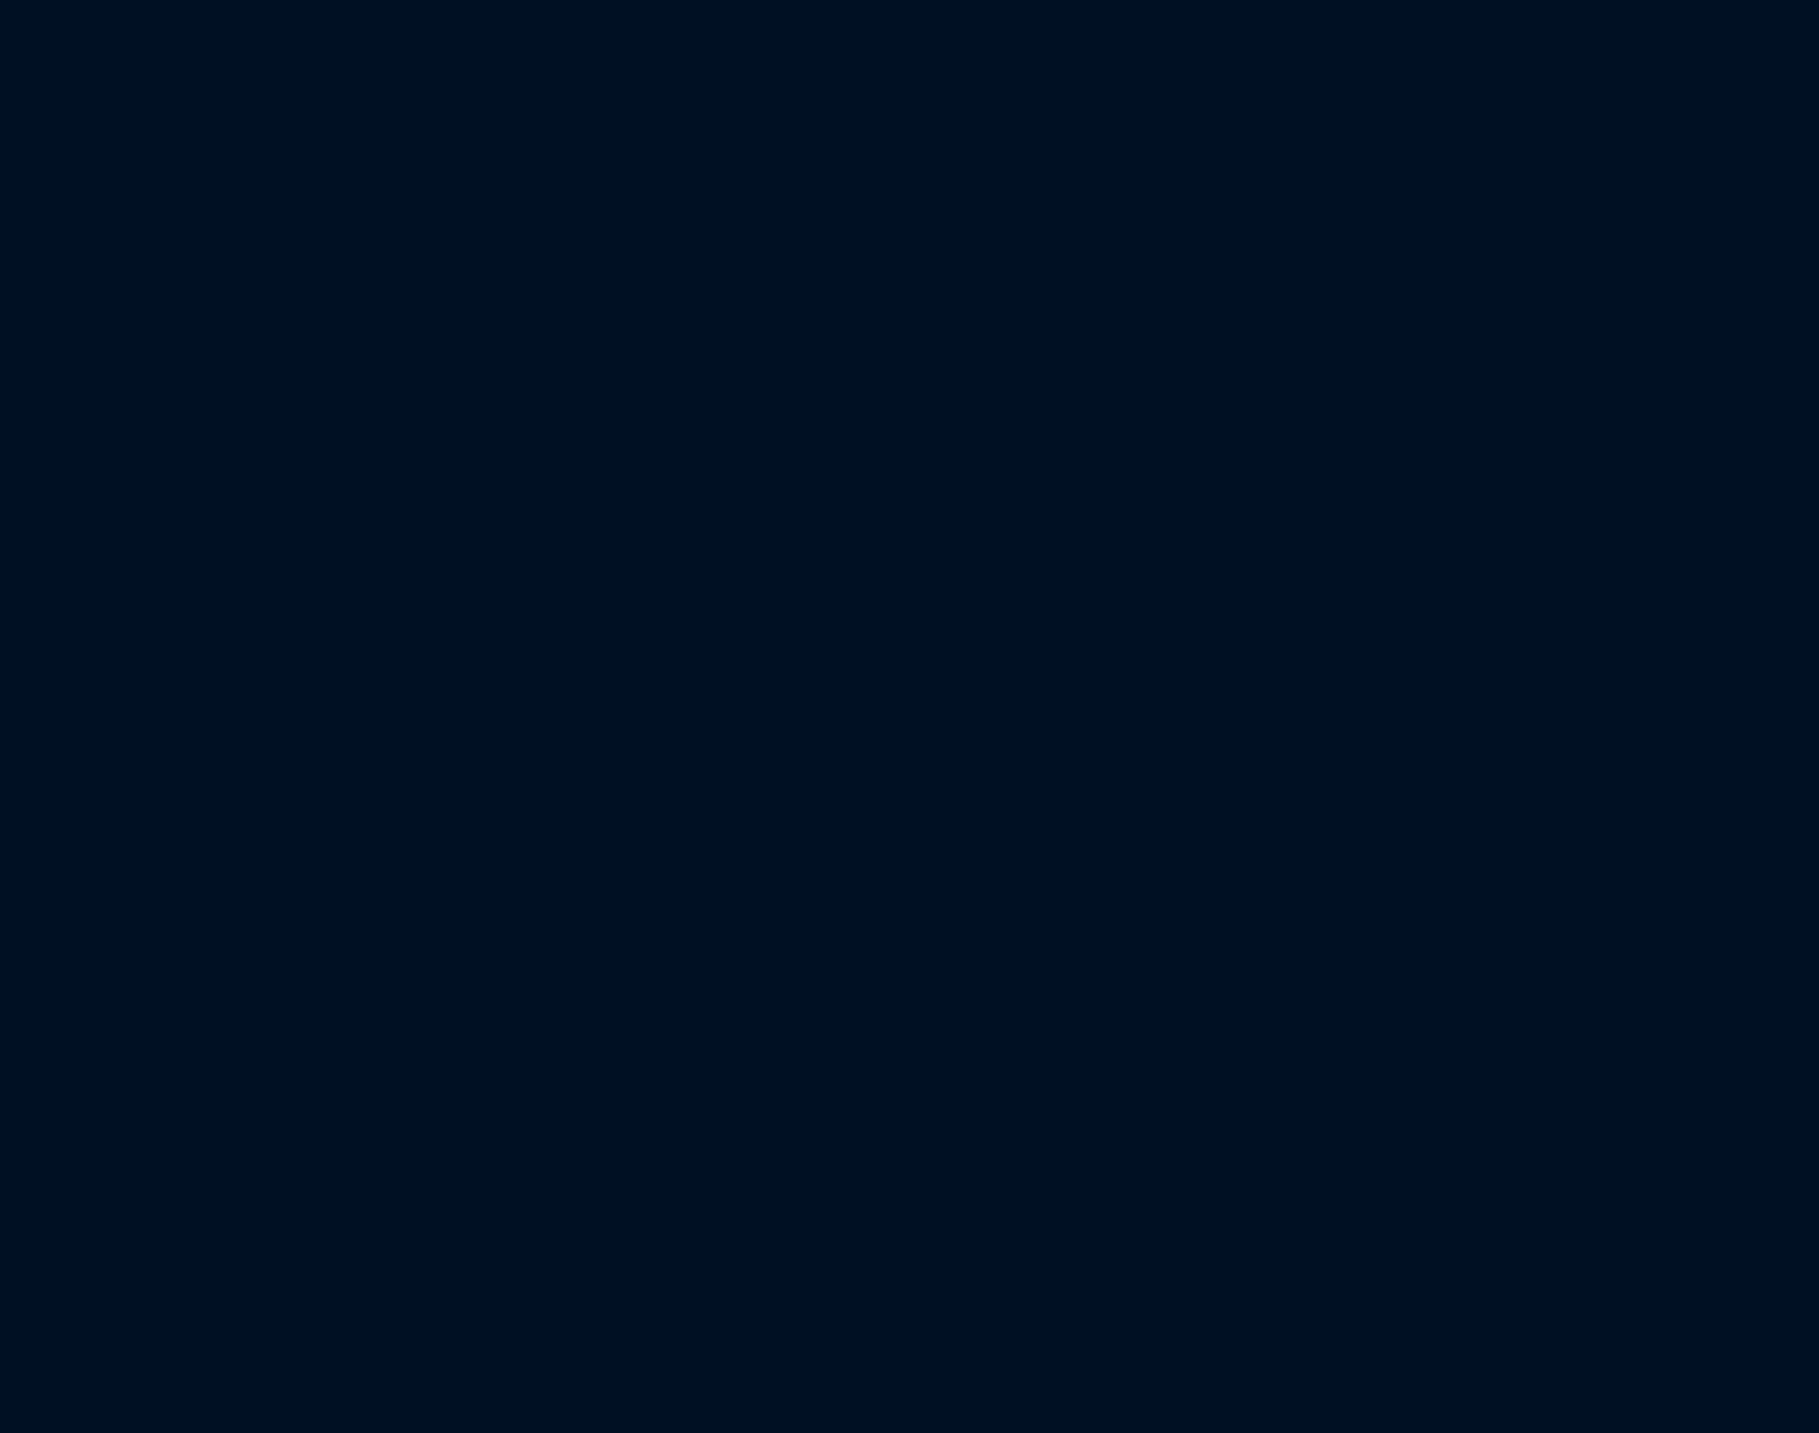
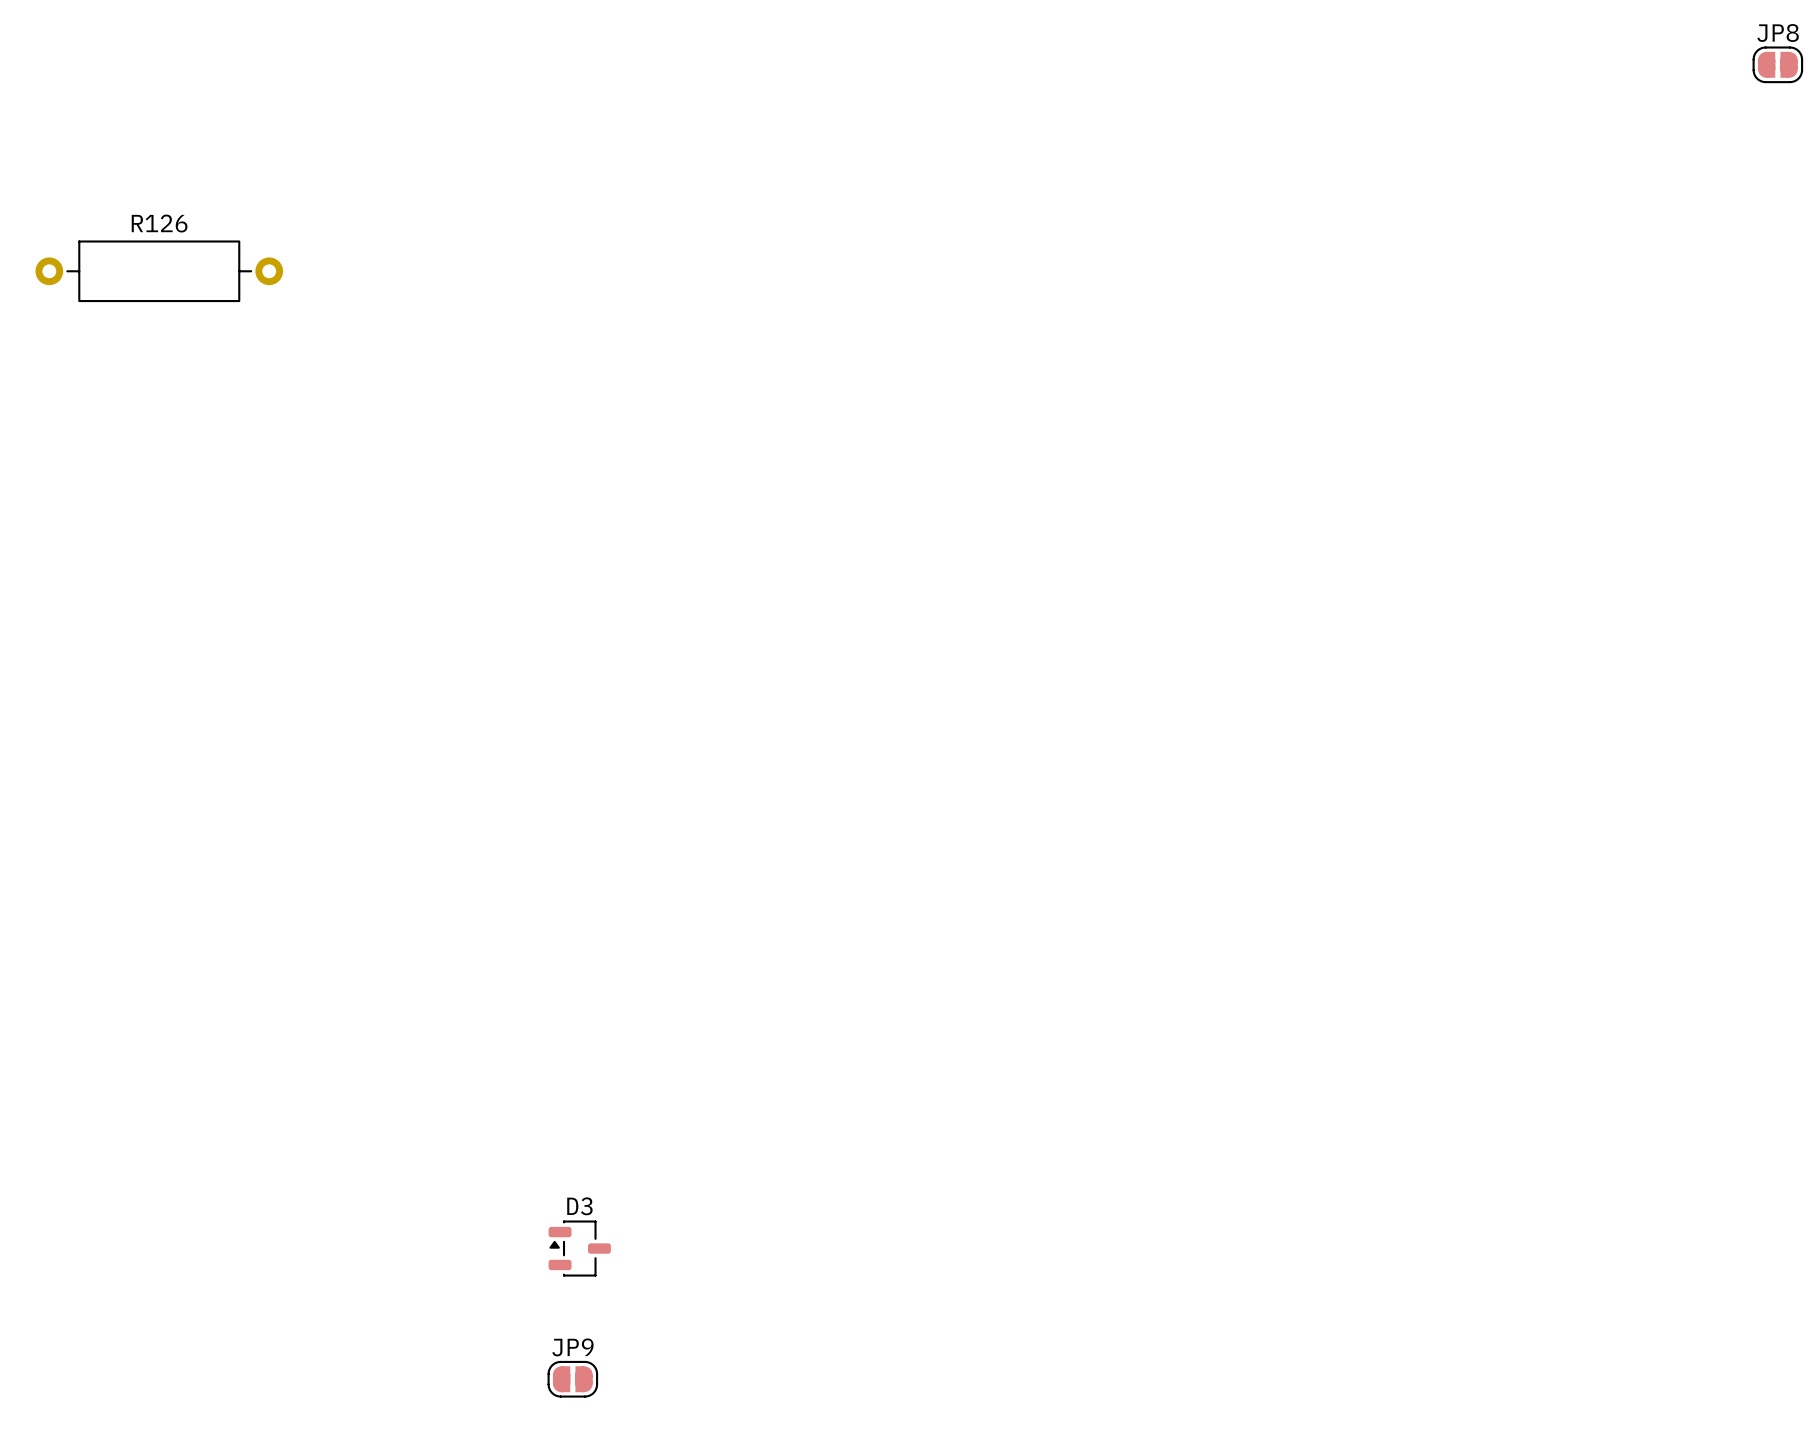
JP8: none -> (1777, 64)
R126: none -> (159, 271)
D3: none -> (579, 1248)
JP9: none -> (572, 1379)

